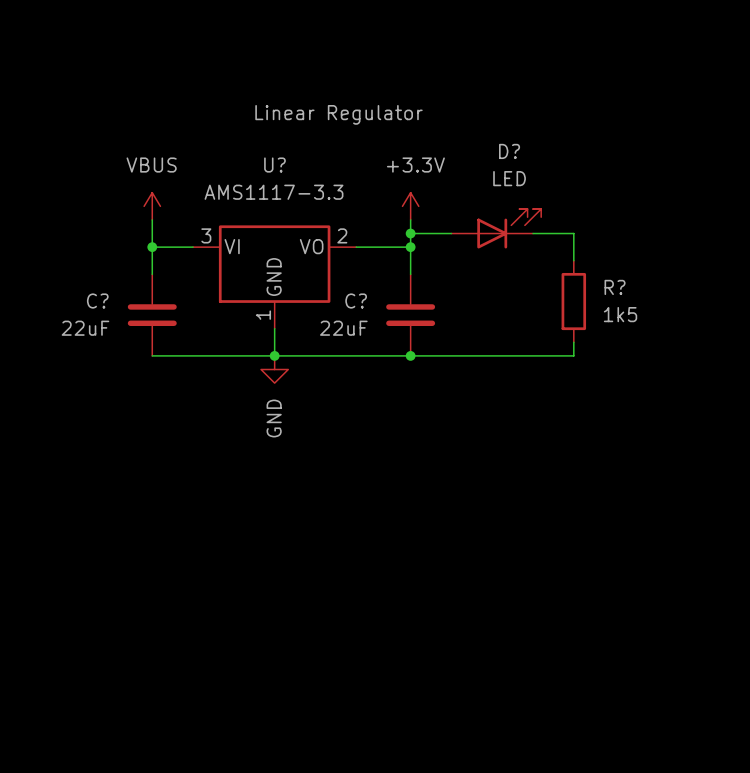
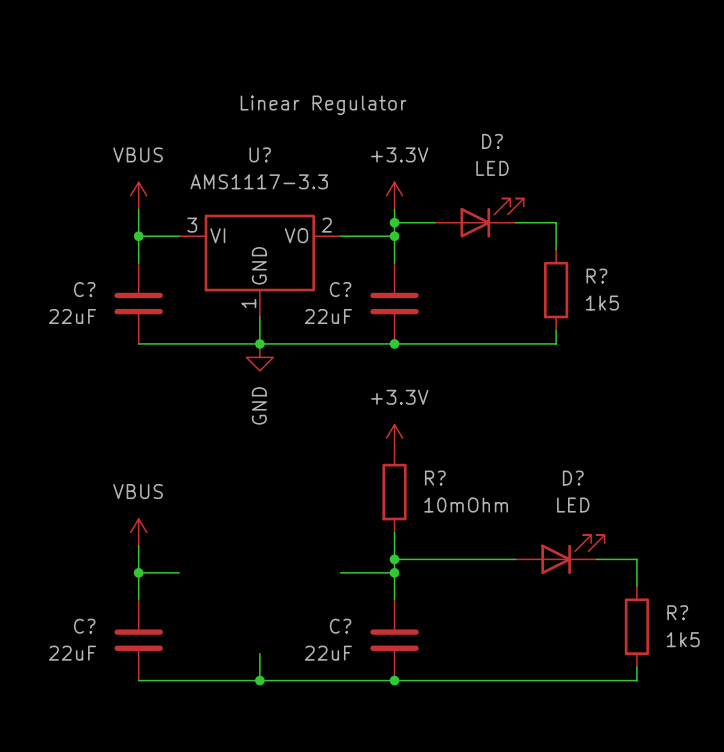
power symbol: none -> +3.3V (394, 438)
R?: none -> 10mOhm (394, 492)
power symbol: none -> VBUS (138, 532)
wire: none -> (394, 532) (394, 599)
wire: none -> (138, 545) (138, 599)
D?: none -> LED (560, 554)
wire: none -> (394, 559) (515, 559)
junction: none -> (394, 559)
wire: none -> (596, 559) (636, 559) (636, 586)
wire: none -> (138, 572) (179, 572)
junction: none -> (138, 572)
wire: none -> (340, 572) (394, 572)
junction: none -> (394, 572)
R?: none -> 1k5 (636, 626)
C?: none -> 22uF (138, 640)
C?: none -> 22uF (394, 640)
wire: none -> (259, 653) (259, 680)
wire: none -> (636, 667) (636, 680) (138, 680)
junction: none -> (259, 680)
junction: none -> (394, 680)

